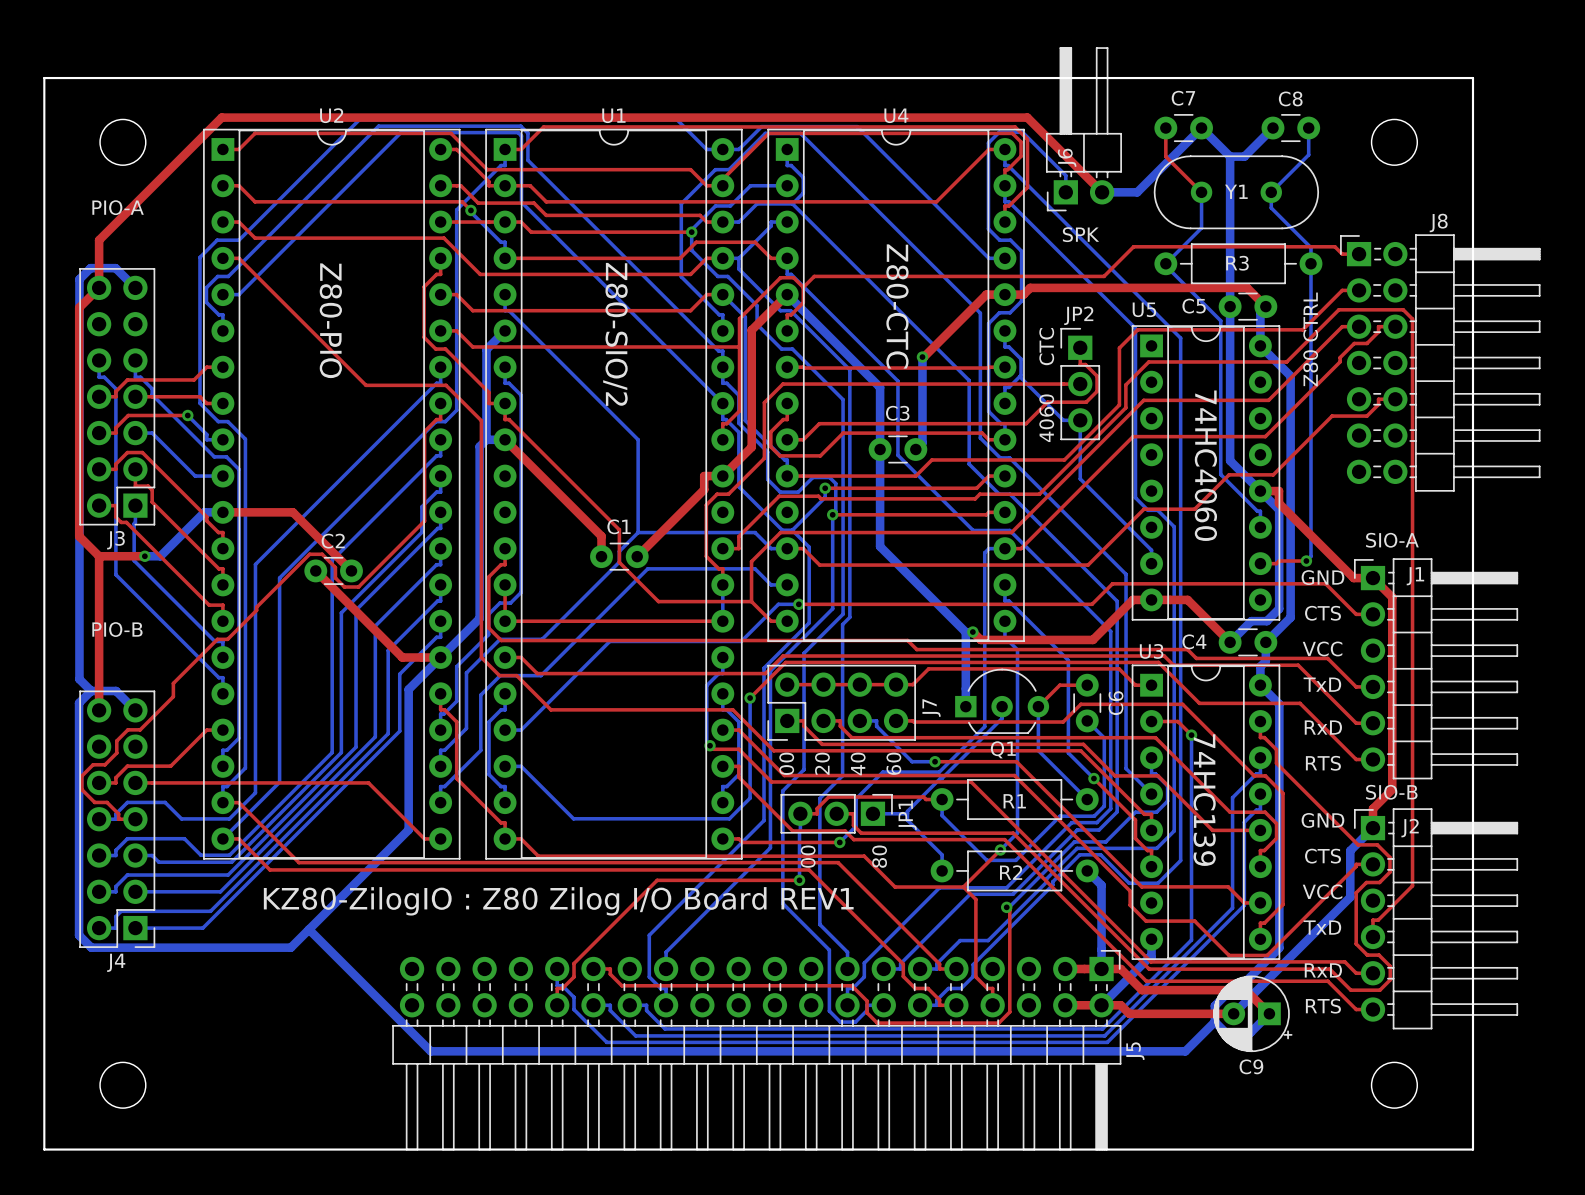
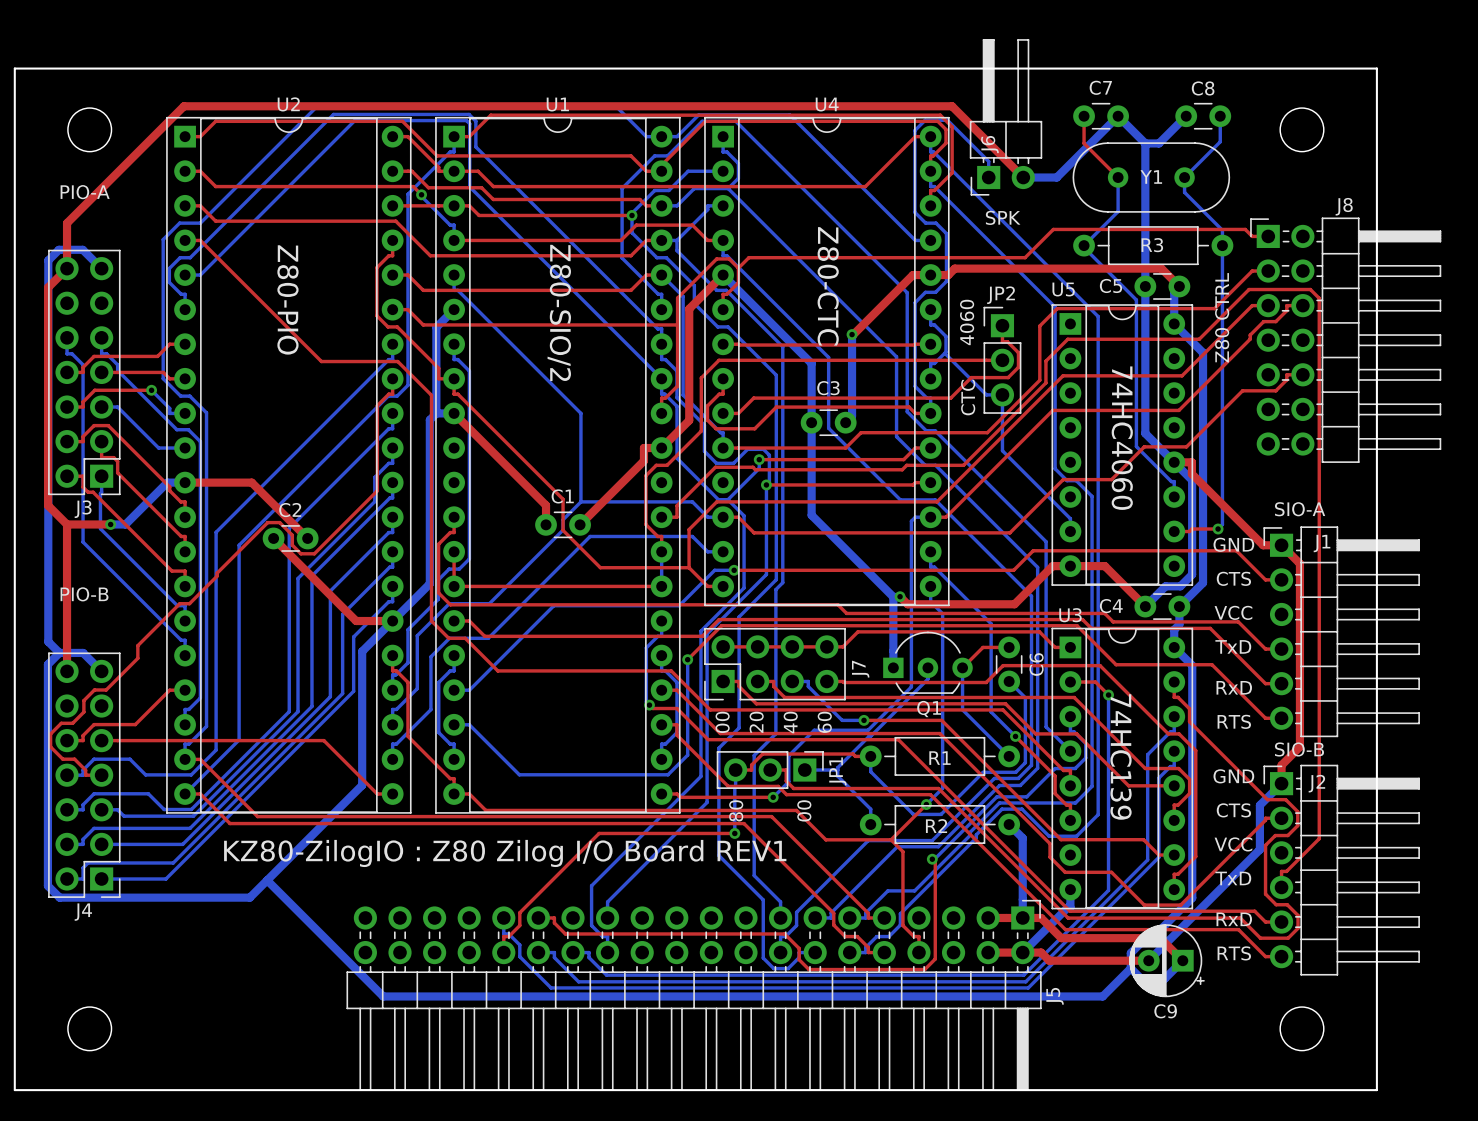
text position: CTC (1046, 346) -> CTC (968, 397)
text position: 4060 (1046, 418) -> 4060 (967, 322)
text position: 00 (808, 856) -> 00 (804, 810)
text position: 80 (879, 856) -> 80 (736, 810)

